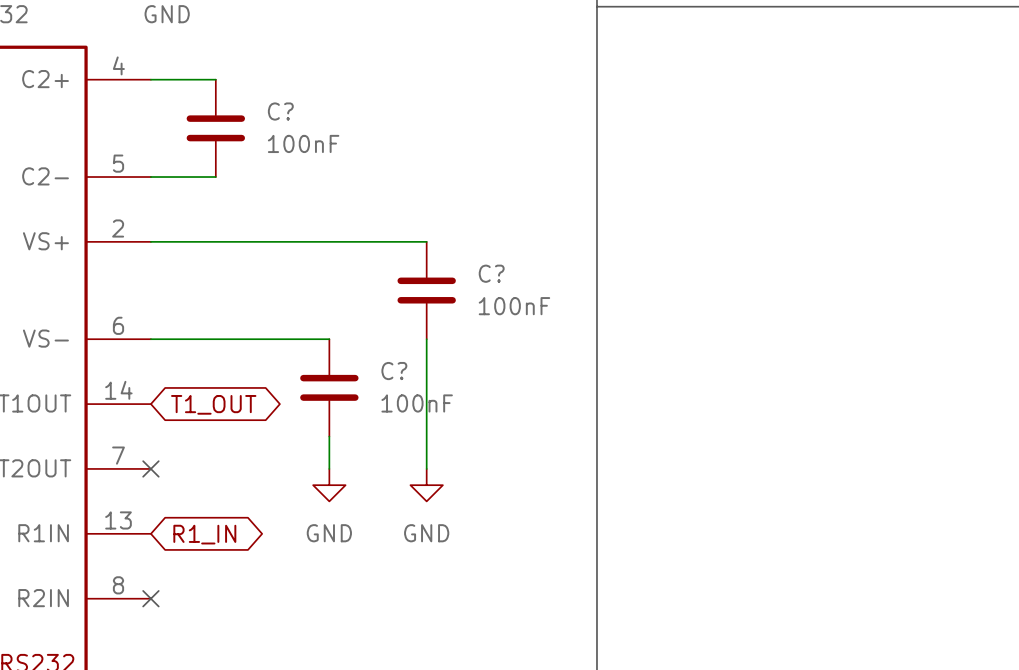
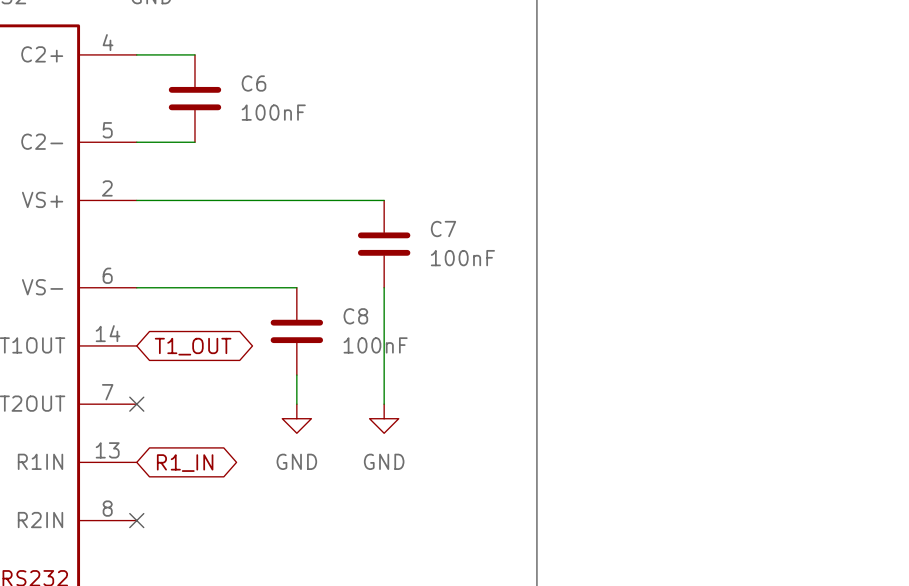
C? name: C? (280, 111) -> C6 (254, 83)
C? name: C? (491, 273) -> C7 (443, 229)
C? name: C? (394, 371) -> C8 (355, 316)

